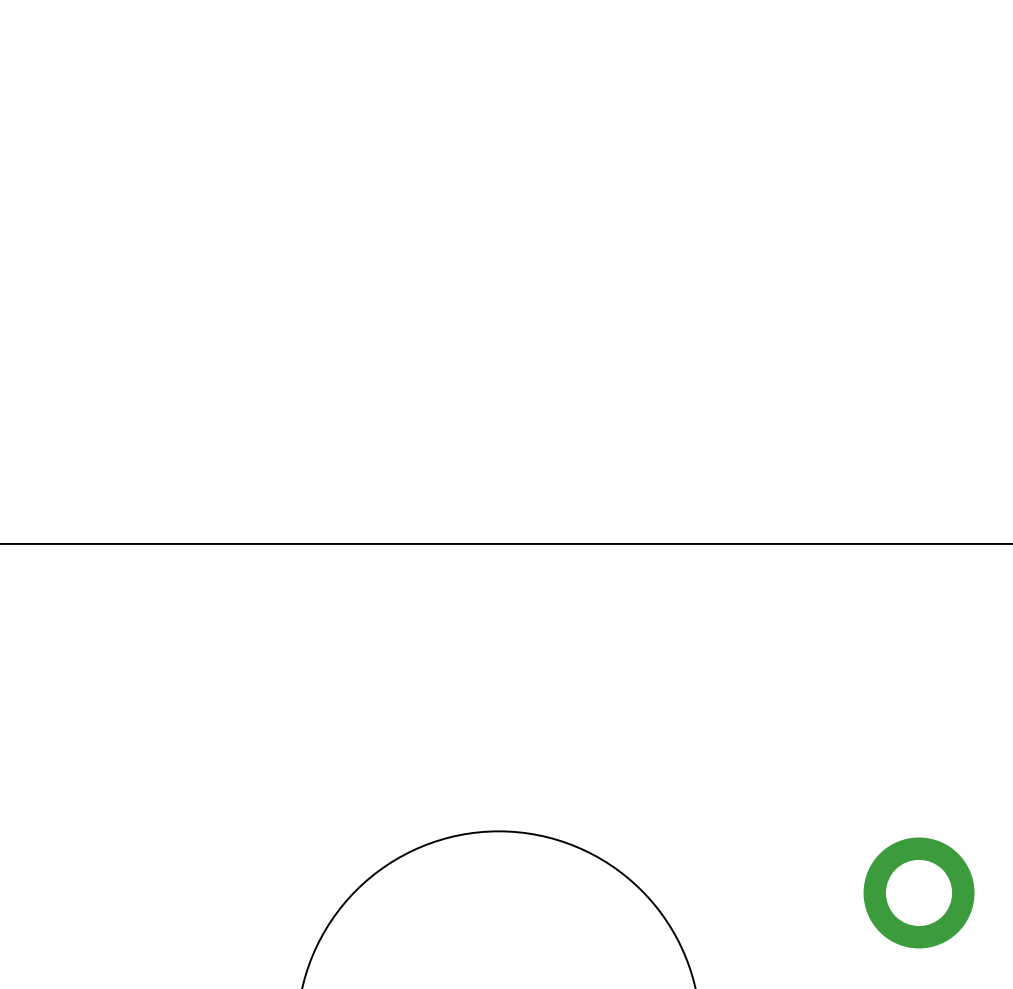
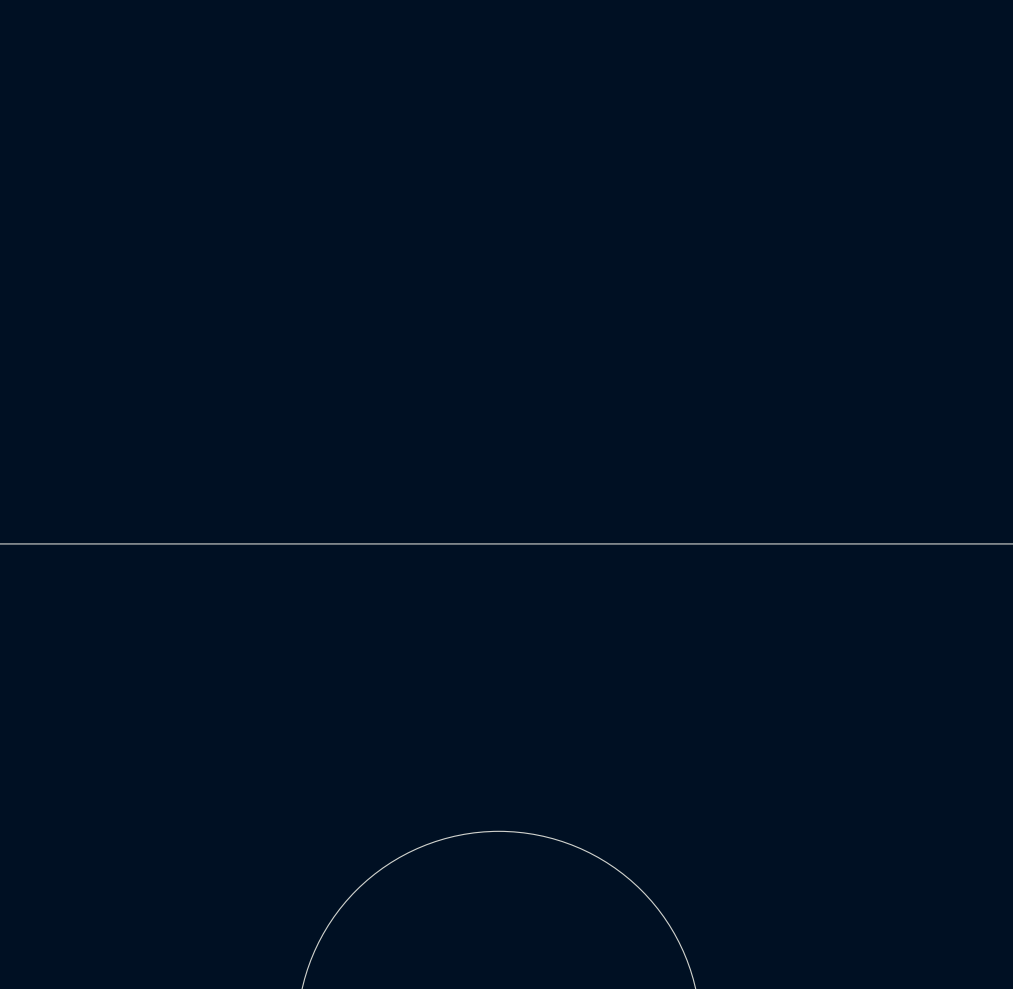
via: (919, 892) -> none

